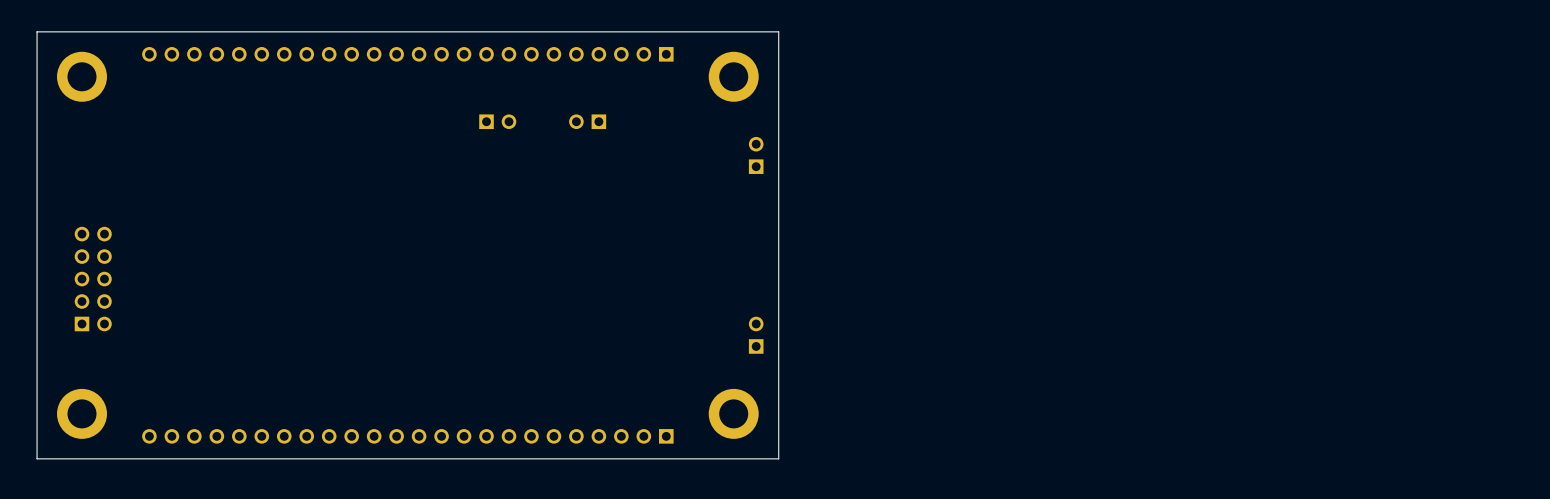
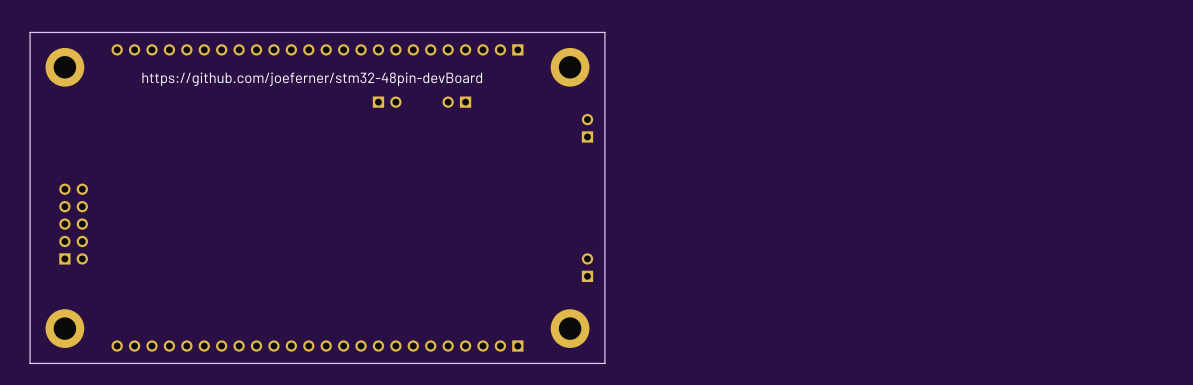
text: none -> https://github.com/joeferner/stm32-48pin-devBoard (312, 79)

